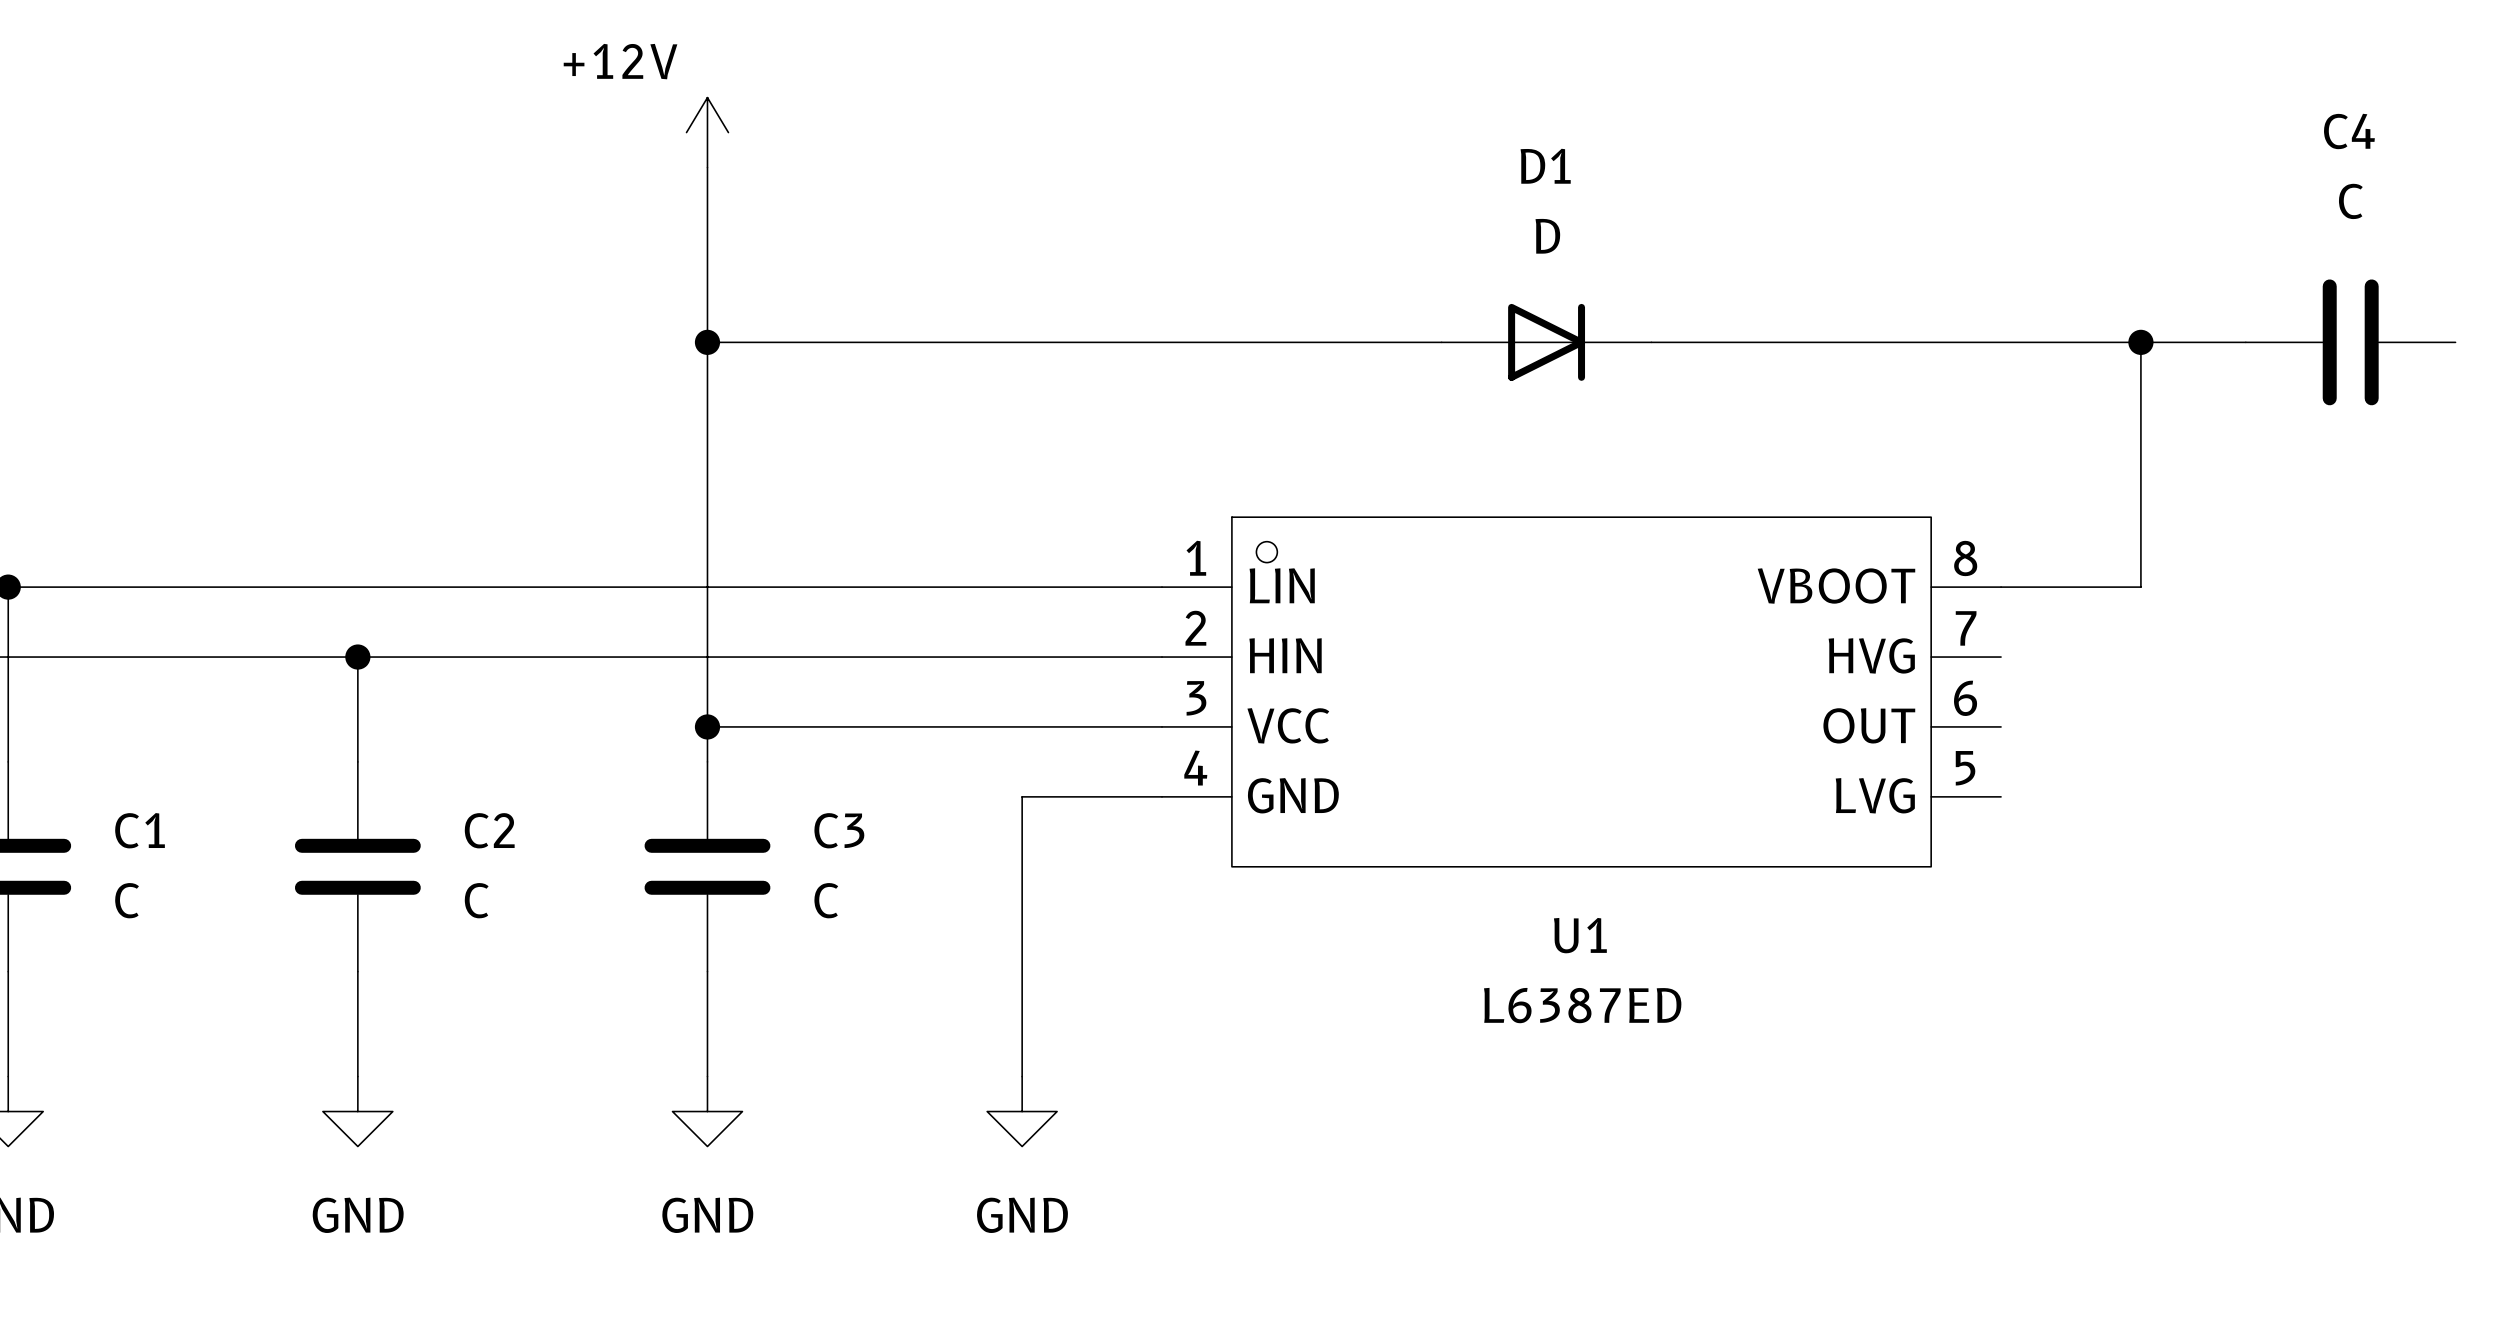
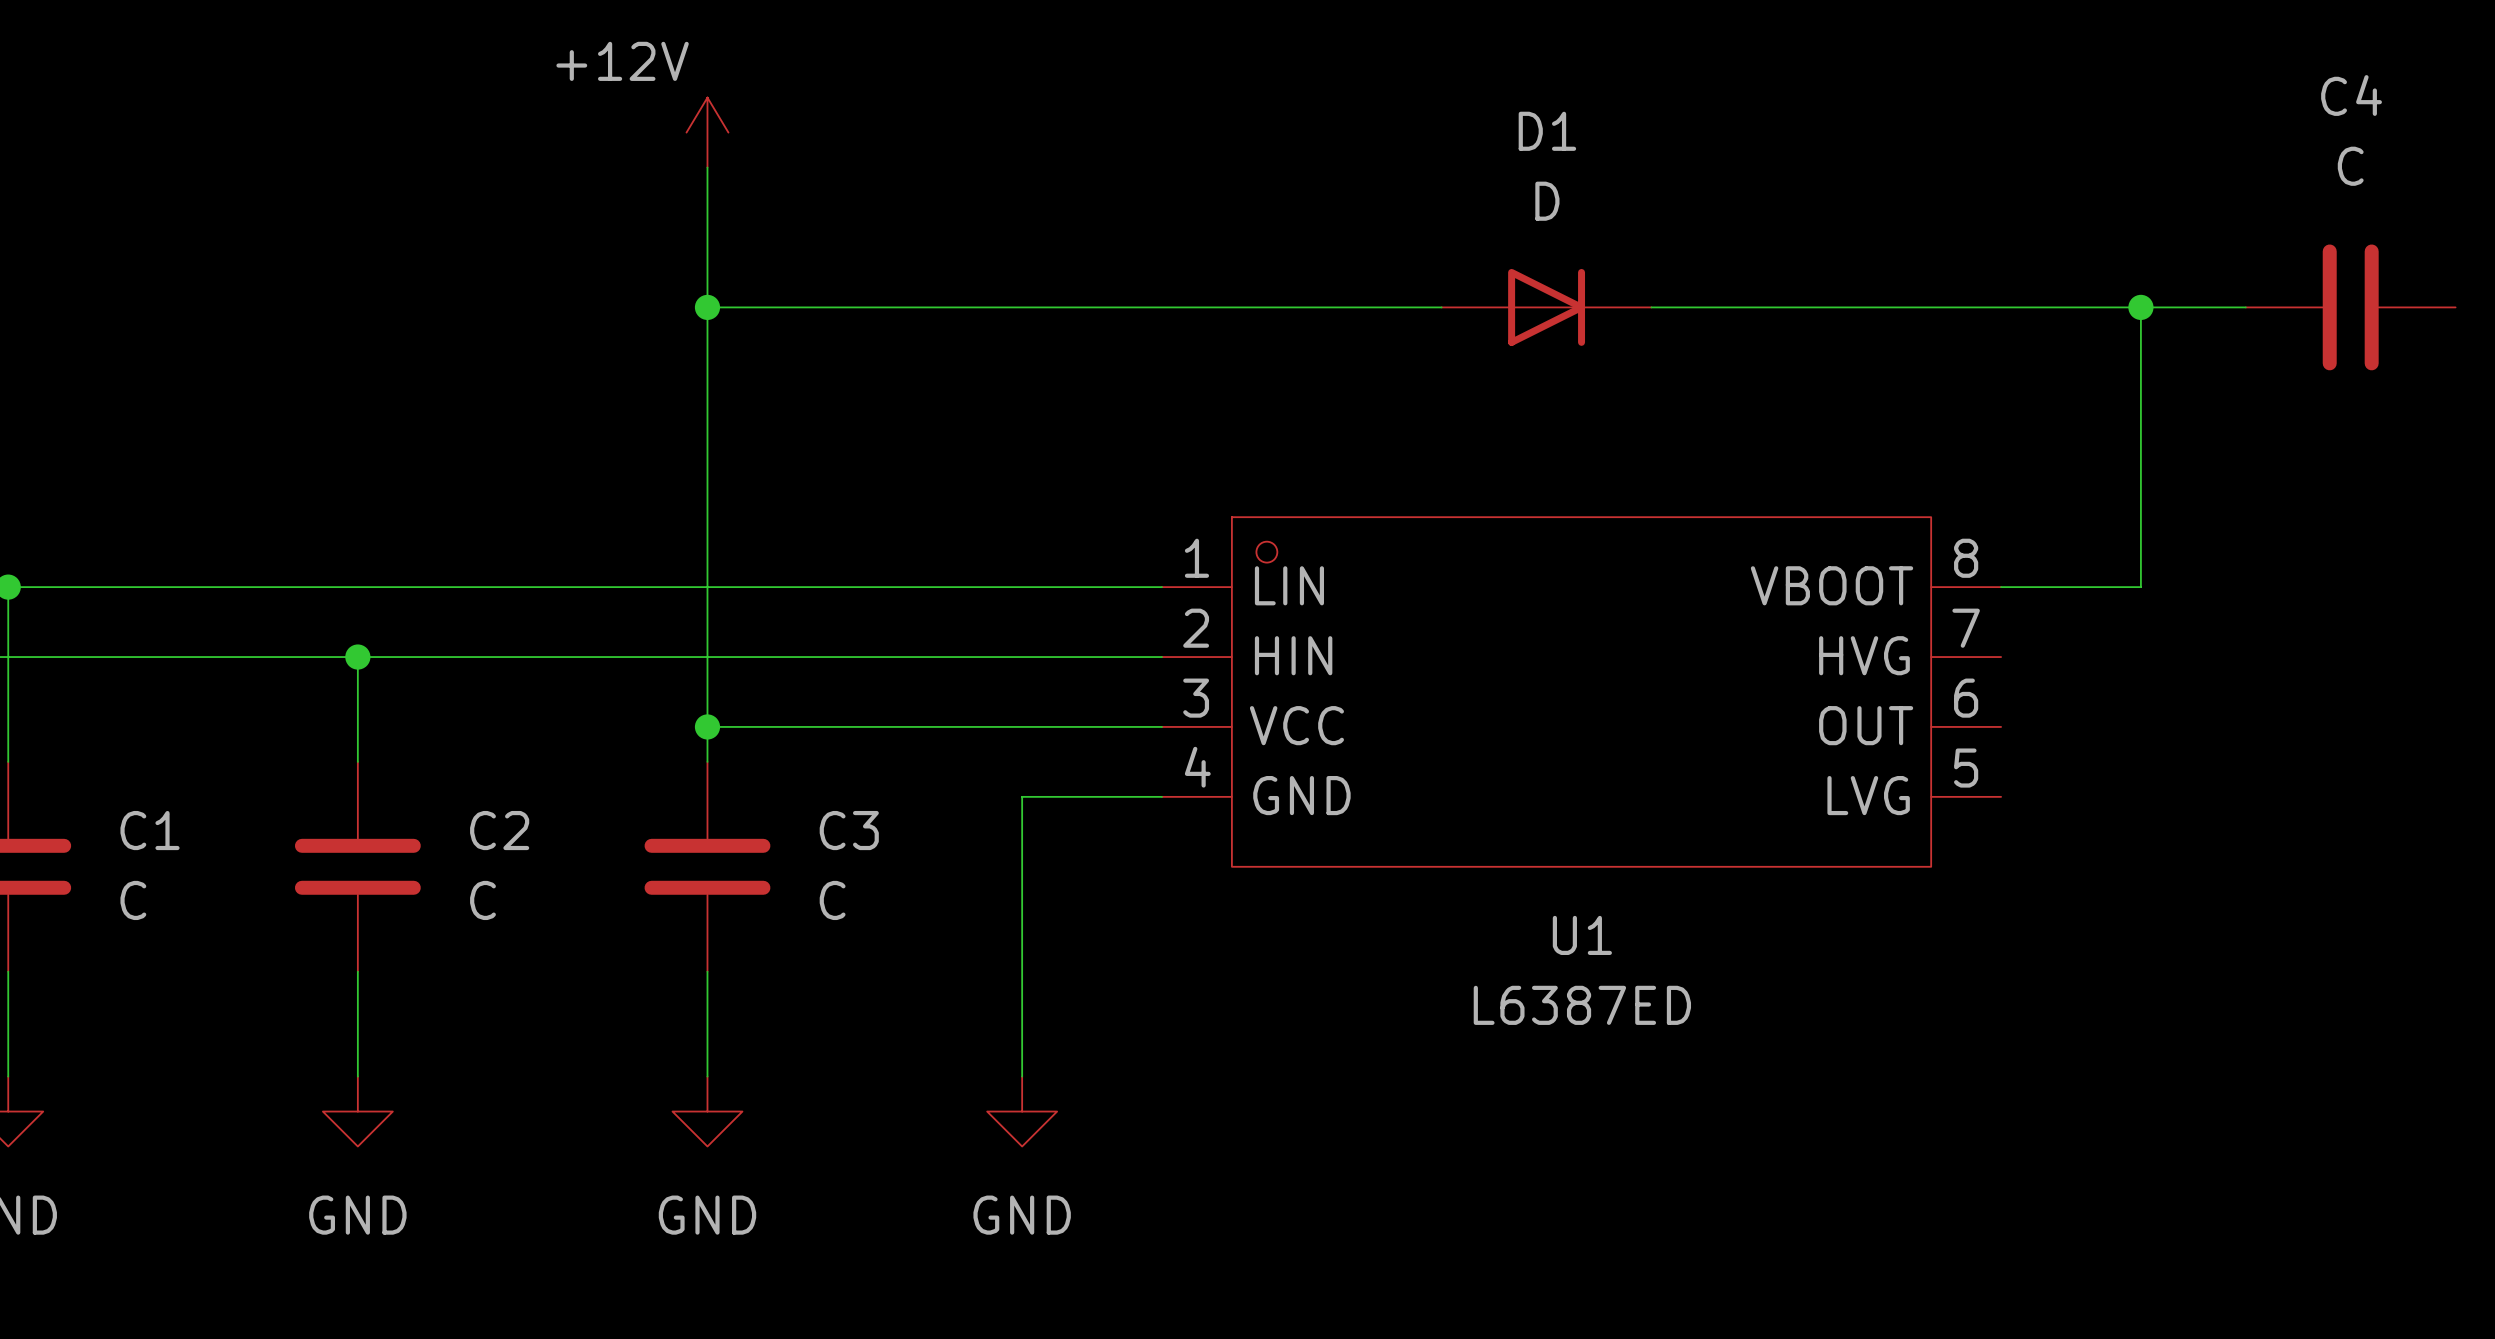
wire: none -> (2140, 307) (2140, 342)
wire: (707, 342) (1441, 342) -> (707, 307) (1441, 307)
junction position: (707, 342) -> (707, 307)
D1 position: (1546, 342) -> (1546, 307)
wire: (1651, 342) (2245, 342) -> (1651, 307) (2245, 307)
junction position: (2140, 342) -> (2140, 307)
C4 position: (2350, 342) -> (2350, 307)

